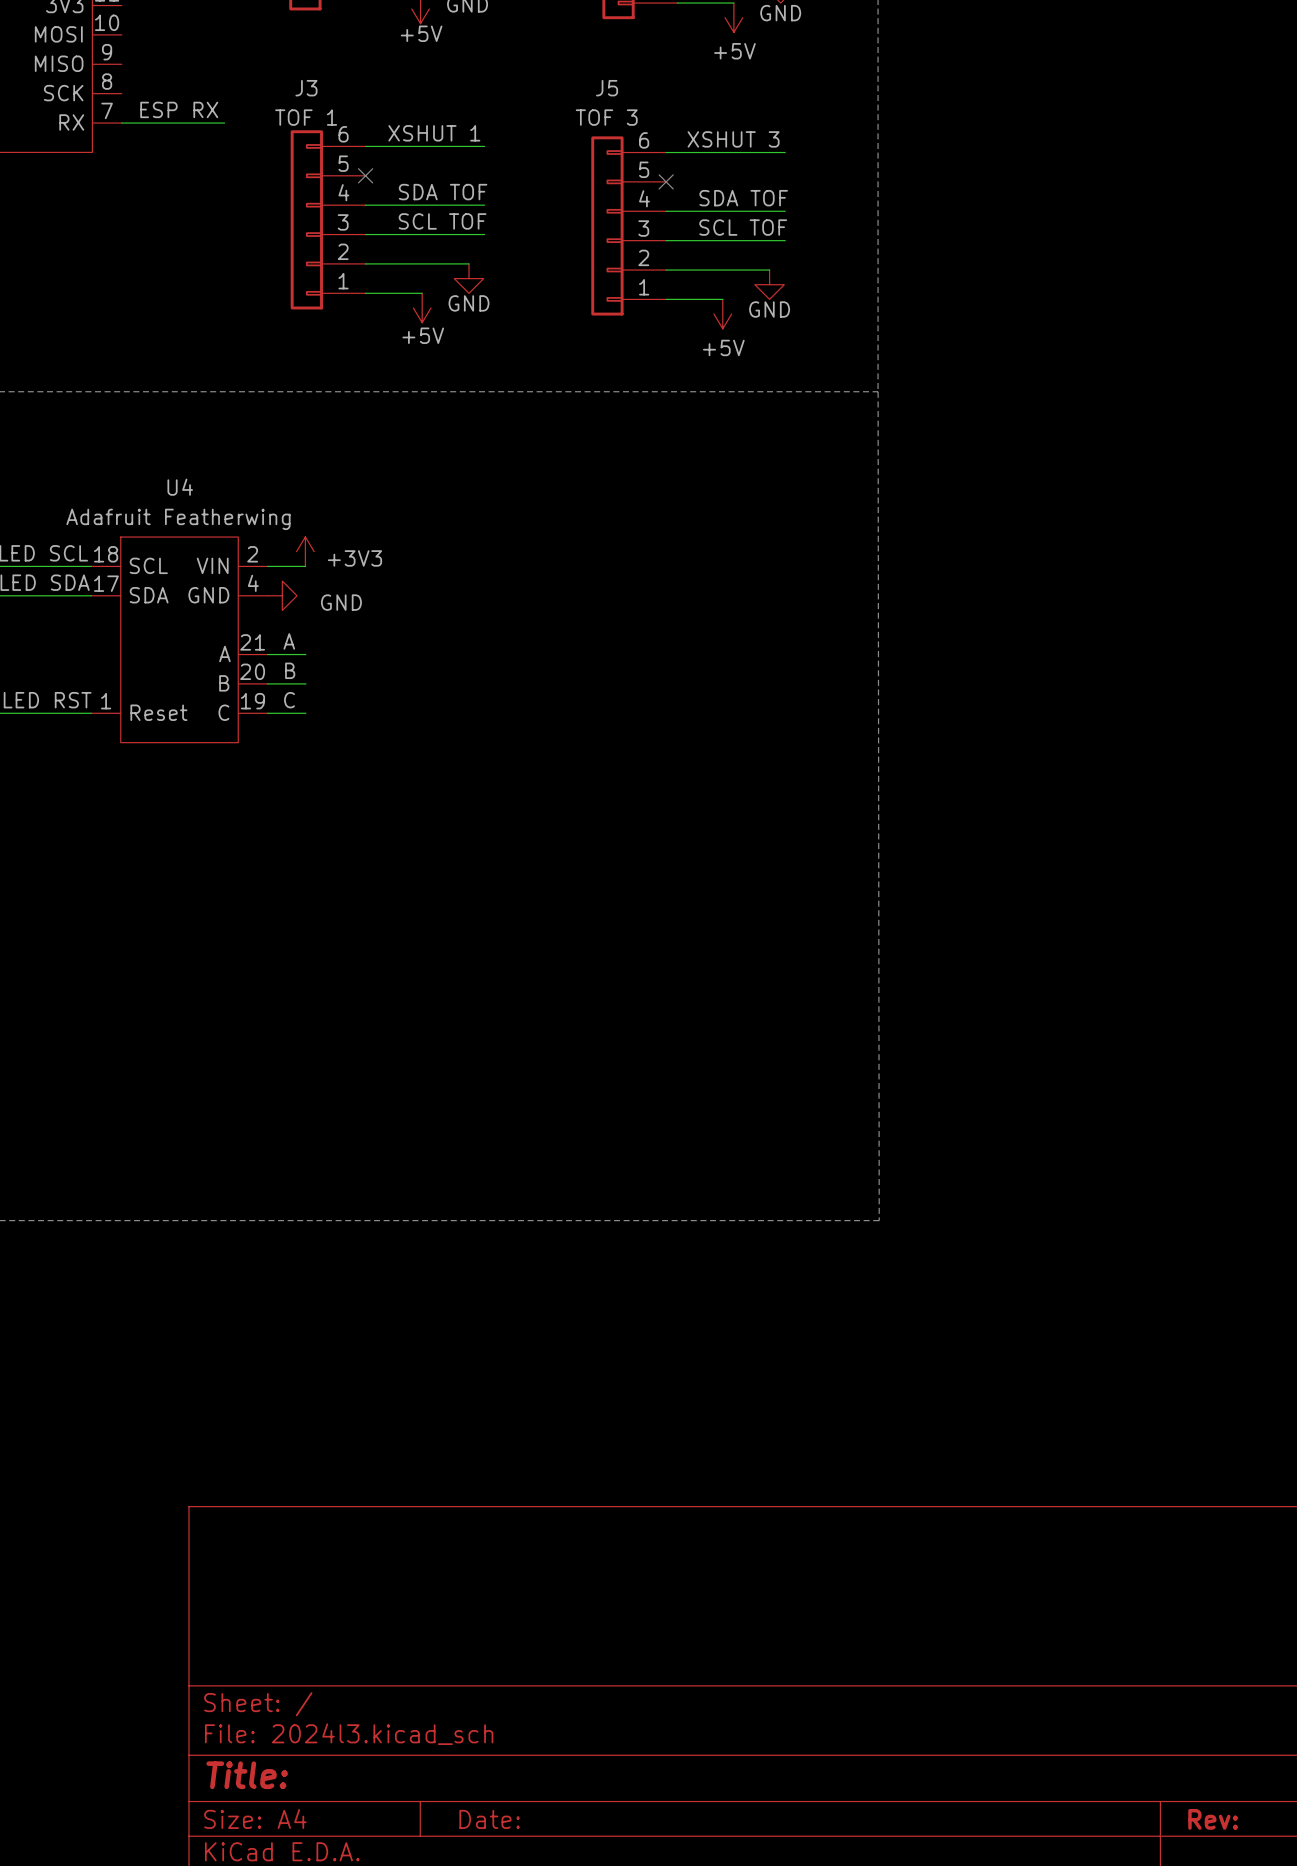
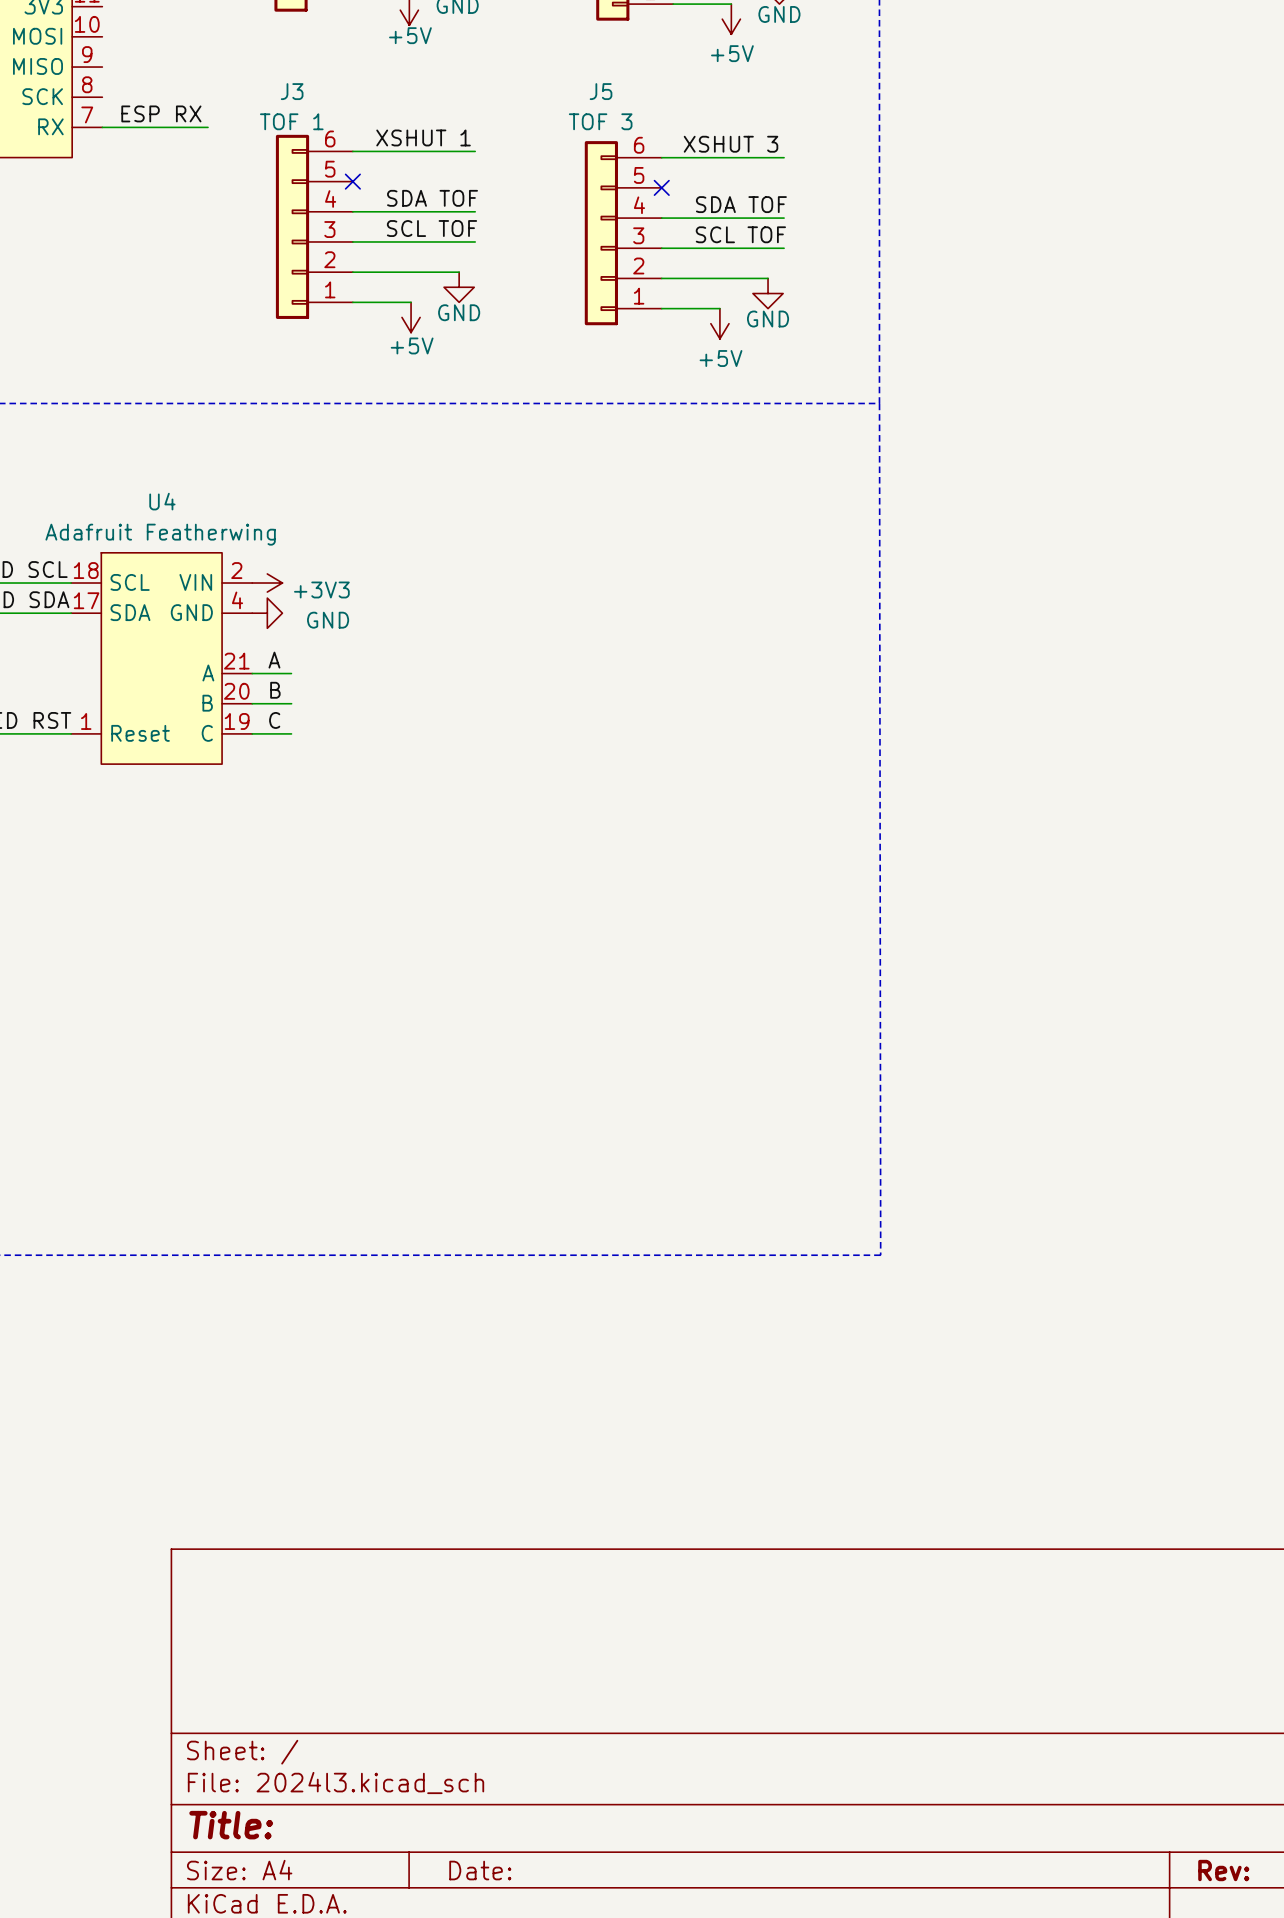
power symbol rotation: 0° (305, 551) -> 90° clockwise (267, 583)
power symbol position: +3V3 (305, 551) -> +3V3 (267, 583)

